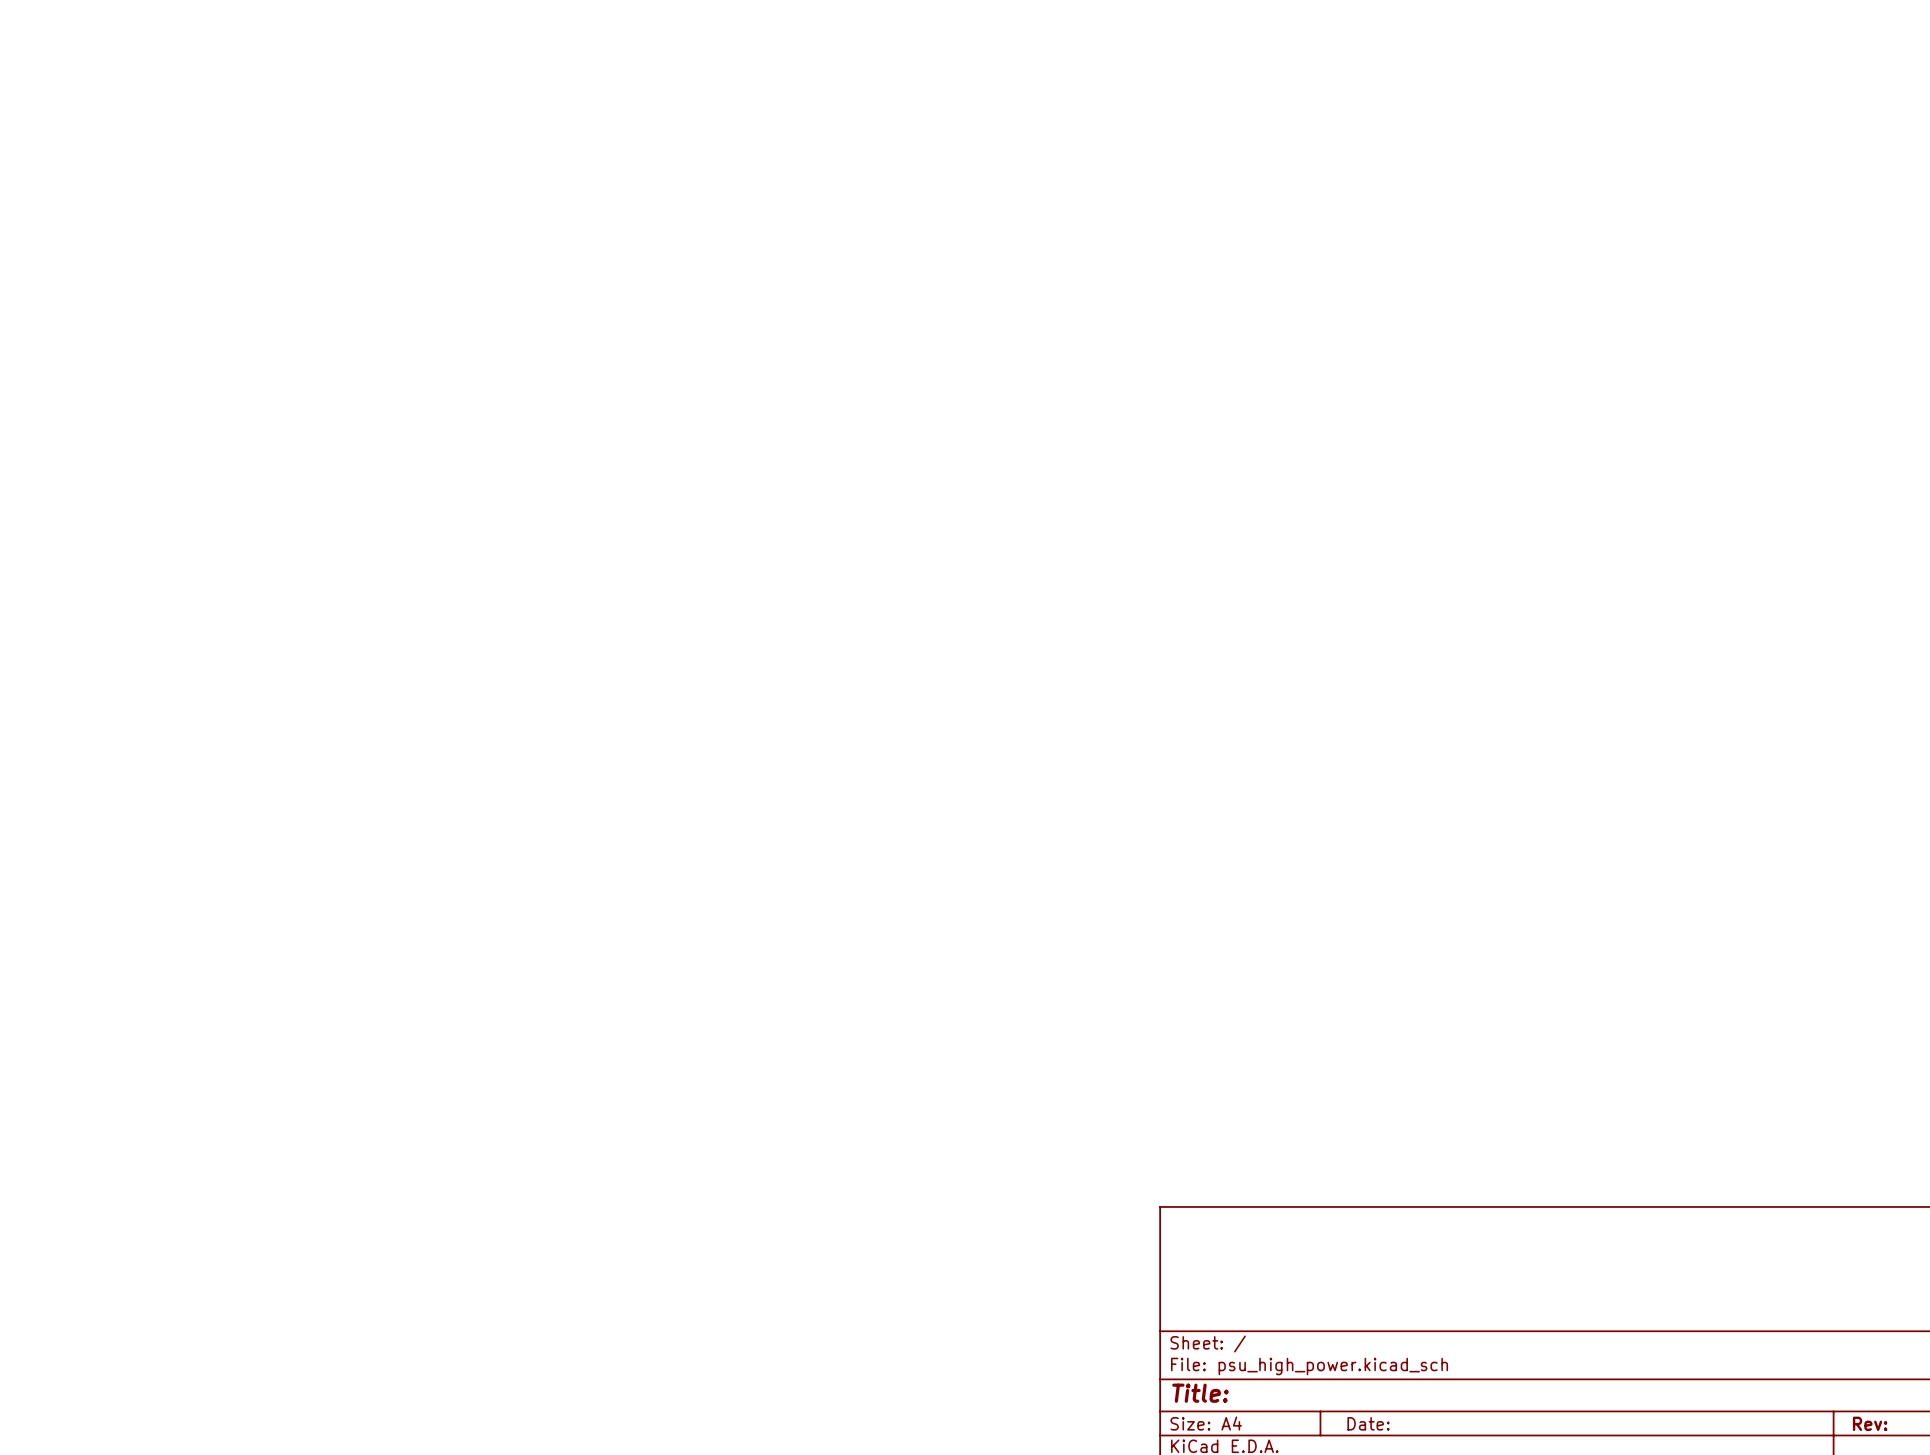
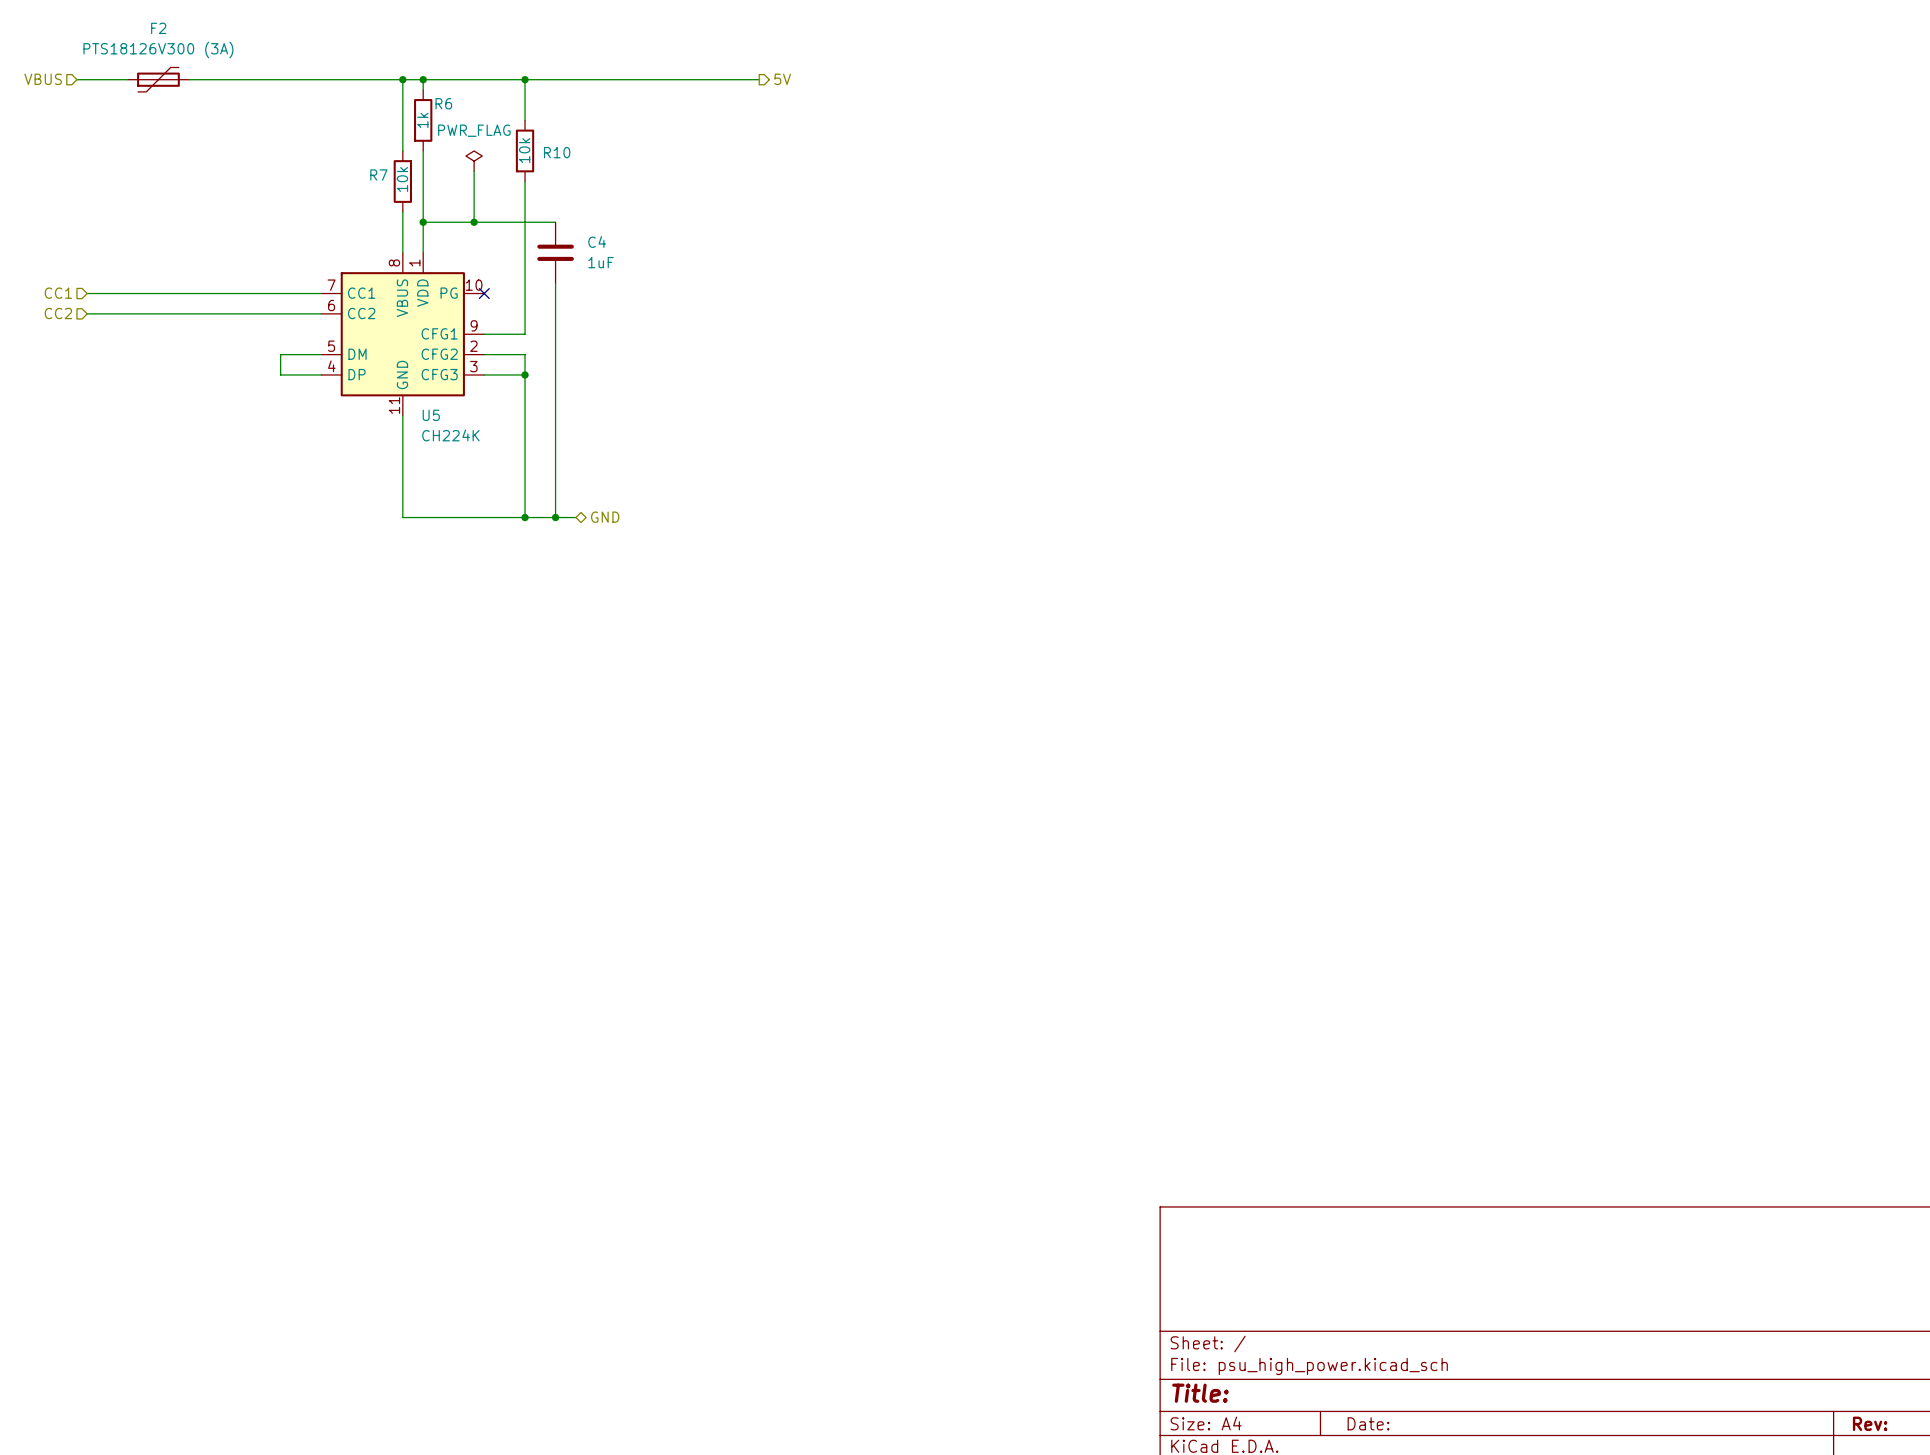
hierarchical label: none -> VBUS (43, 79)
wire: none -> (76, 79) (127, 79)
F2: none -> PTS18126V300 (3A) (158, 79)
wire: none -> (189, 79) (759, 79)
wire: none -> (402, 79) (402, 150)
junction: none -> (402, 79)
wire: none -> (423, 79) (423, 89)
junction: none -> (423, 79)
wire: none -> (525, 79) (525, 120)
junction: none -> (525, 79)
hierarchical label: none -> 5V (782, 79)
R6: none -> 1k (423, 120)
wire: none -> (423, 150) (423, 252)
R10: none -> 10k (525, 150)
power symbol: none -> PWR_FLAG (474, 161)
wire: none -> (474, 171) (474, 222)
R7: none -> 10k (402, 181)
wire: none -> (525, 181) (525, 334) (484, 334)
wire: none -> (402, 212) (402, 252)
wire: none -> (423, 222) (555, 222)
junction: none -> (423, 222)
junction: none -> (474, 222)
C4: none -> 1uF (555, 252)
wire: none -> (555, 283) (555, 517)
hierarchical label: none -> CC1 (58, 293)
wire: none -> (87, 293) (321, 293)
no-connect mark: none -> (484, 293)
hierarchical label: none -> CC2 (58, 313)
wire: none -> (87, 313) (321, 313)
U5: none -> CH224K (402, 334)
wire: none -> (321, 354) (280, 354) (280, 374) (321, 374)
wire: none -> (484, 354) (525, 354) (525, 517)
wire: none -> (484, 374) (525, 374)
junction: none -> (525, 374)
wire: none -> (402, 415) (402, 517) (575, 517)
junction: none -> (525, 517)
junction: none -> (555, 517)
hierarchical label: none -> GND (605, 517)

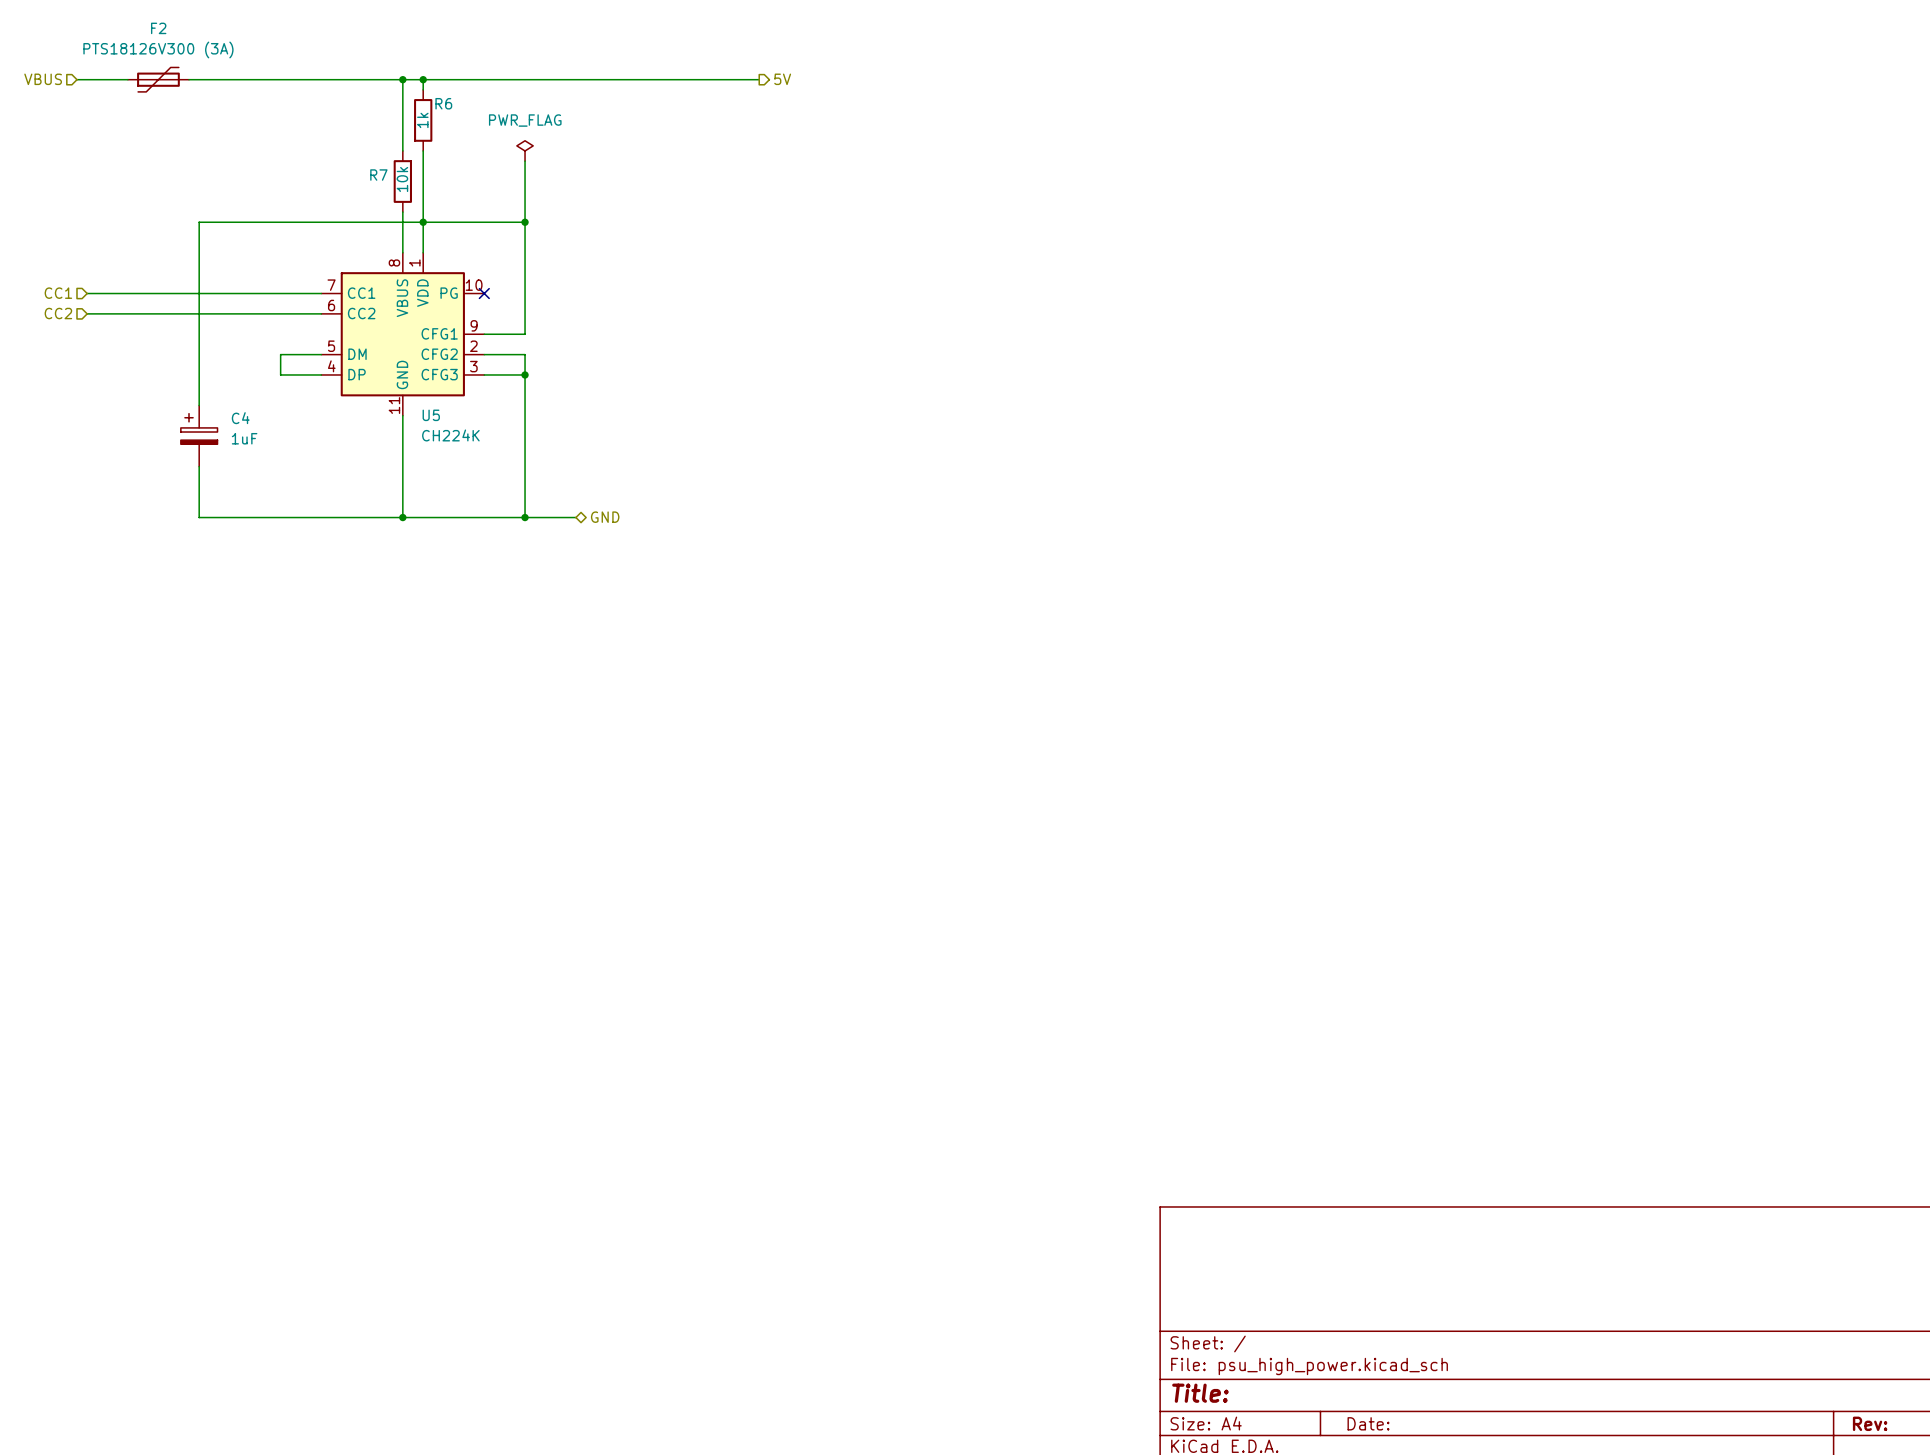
wire: (525, 79) (525, 120) -> none
junction: (525, 79) -> none
R10: 10k (525, 150) -> none
power symbol position: PWR_FLAG (474, 161) -> PWR_FLAG (525, 150)
wire: (474, 171) (474, 222) -> none
wire: none -> (423, 222) (199, 222) (199, 405)
junction: (474, 222) -> none
wire: (525, 222) (555, 222) -> none
junction: none -> (525, 222)
C4 symbol: [537, 222, 574, 284] -> [180, 405, 218, 467]
wire: (555, 283) (555, 517) -> none
wire: none -> (199, 466) (199, 517) (402, 517)
junction: none -> (402, 517)
junction: (555, 517) -> none

